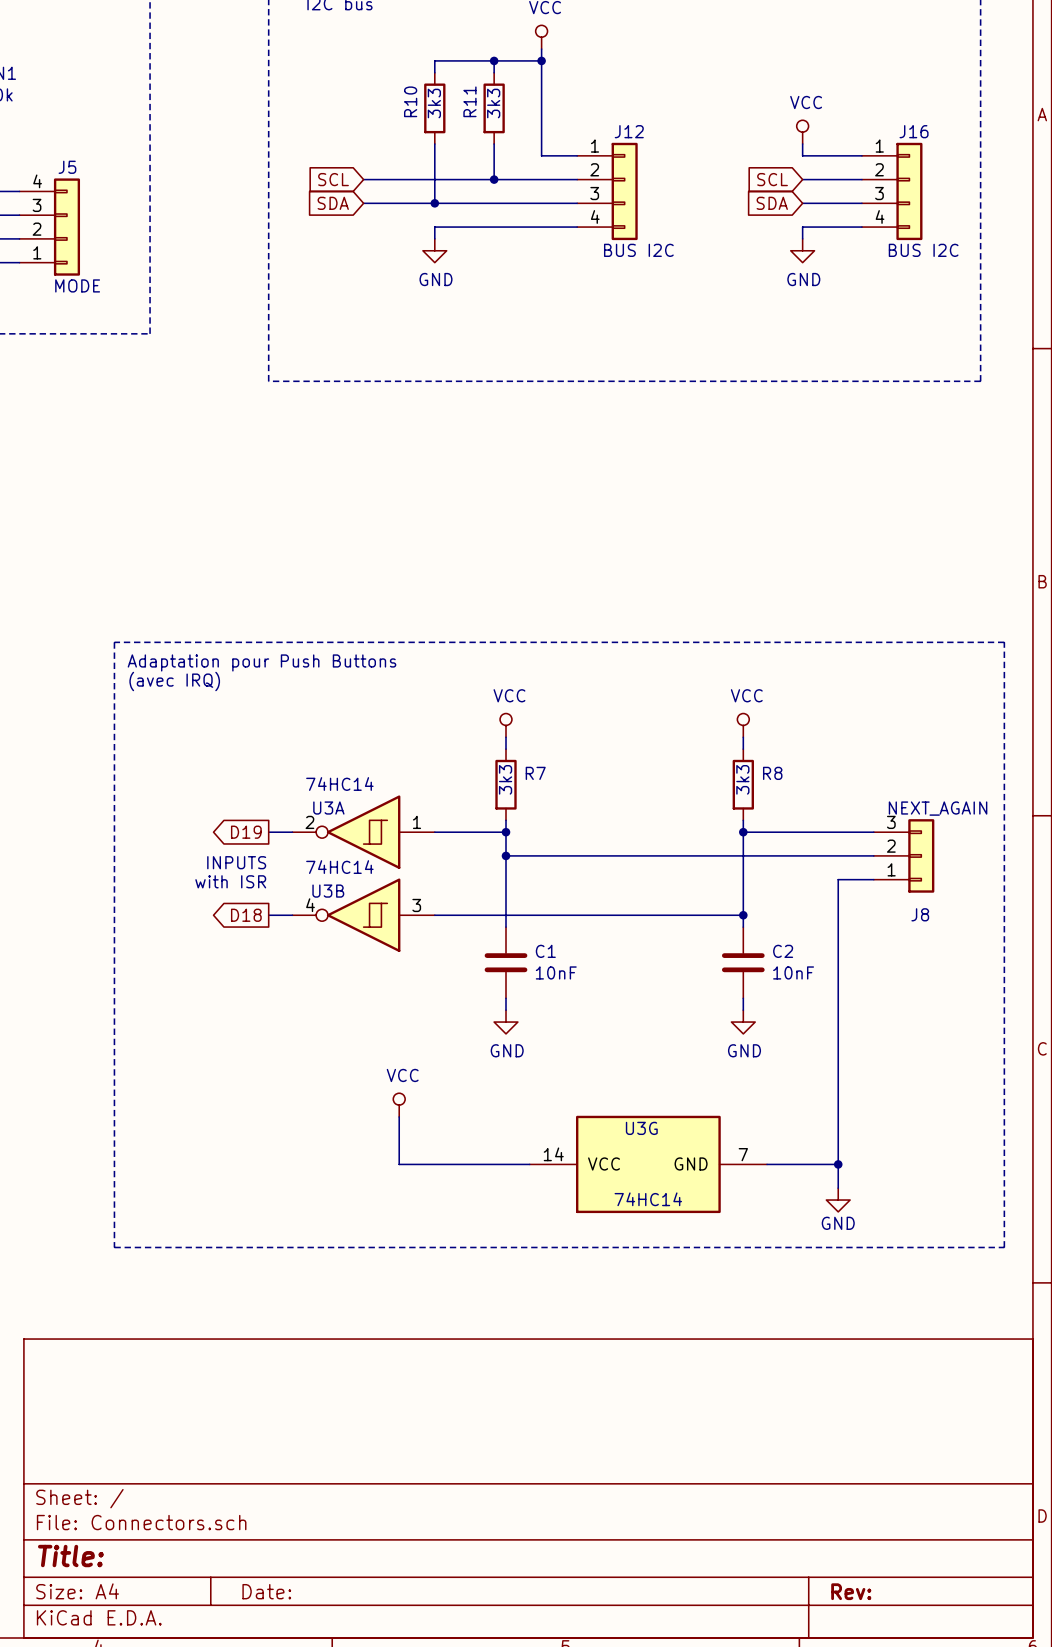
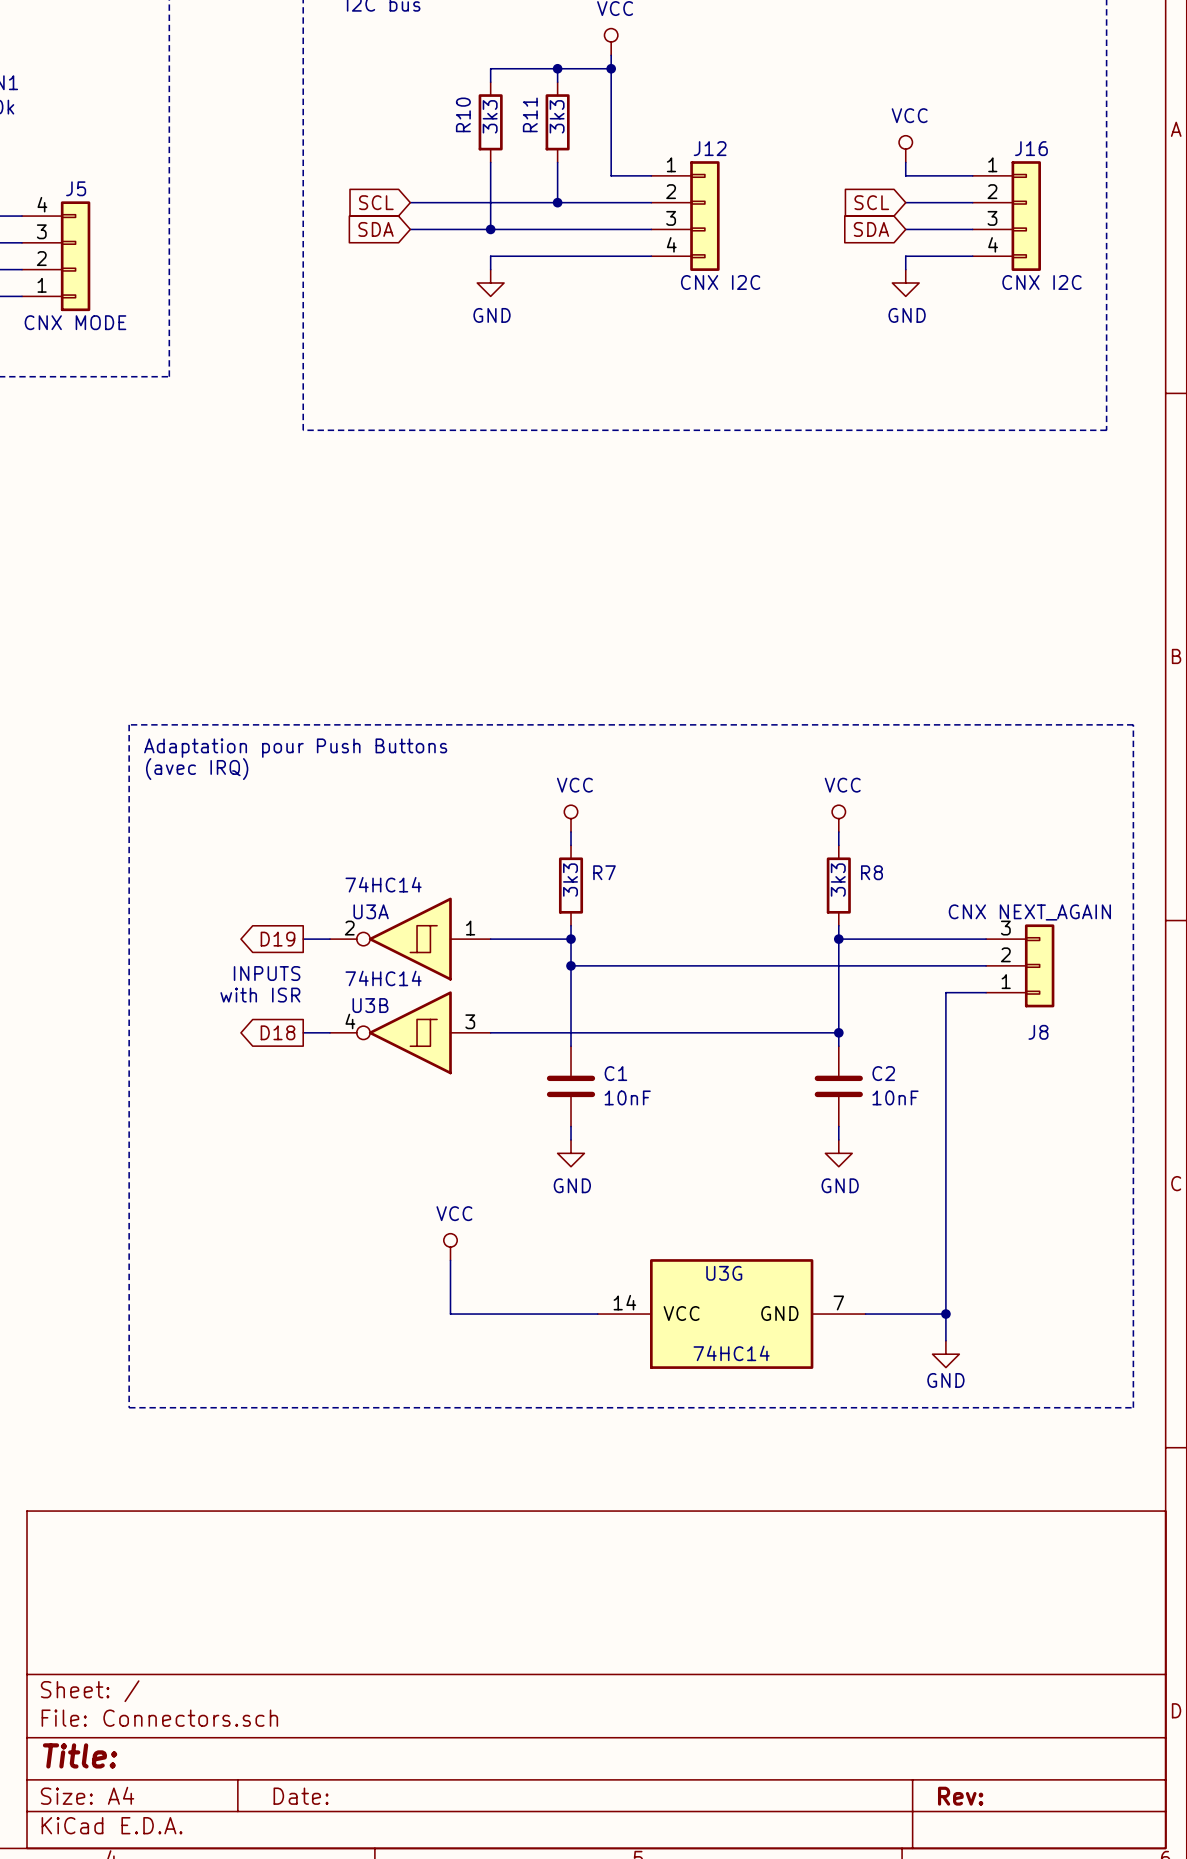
J12 value: BUS I2C (638, 250) -> CNX I2C (720, 282)
J16 value: BUS I2C (923, 250) -> CNX I2C (1041, 282)
J5 value: MODE (77, 285) -> CNX MODE (75, 322)
J8 value: NEXT_AGAIN (938, 808) -> CNX NEXT_AGAIN (1029, 912)

